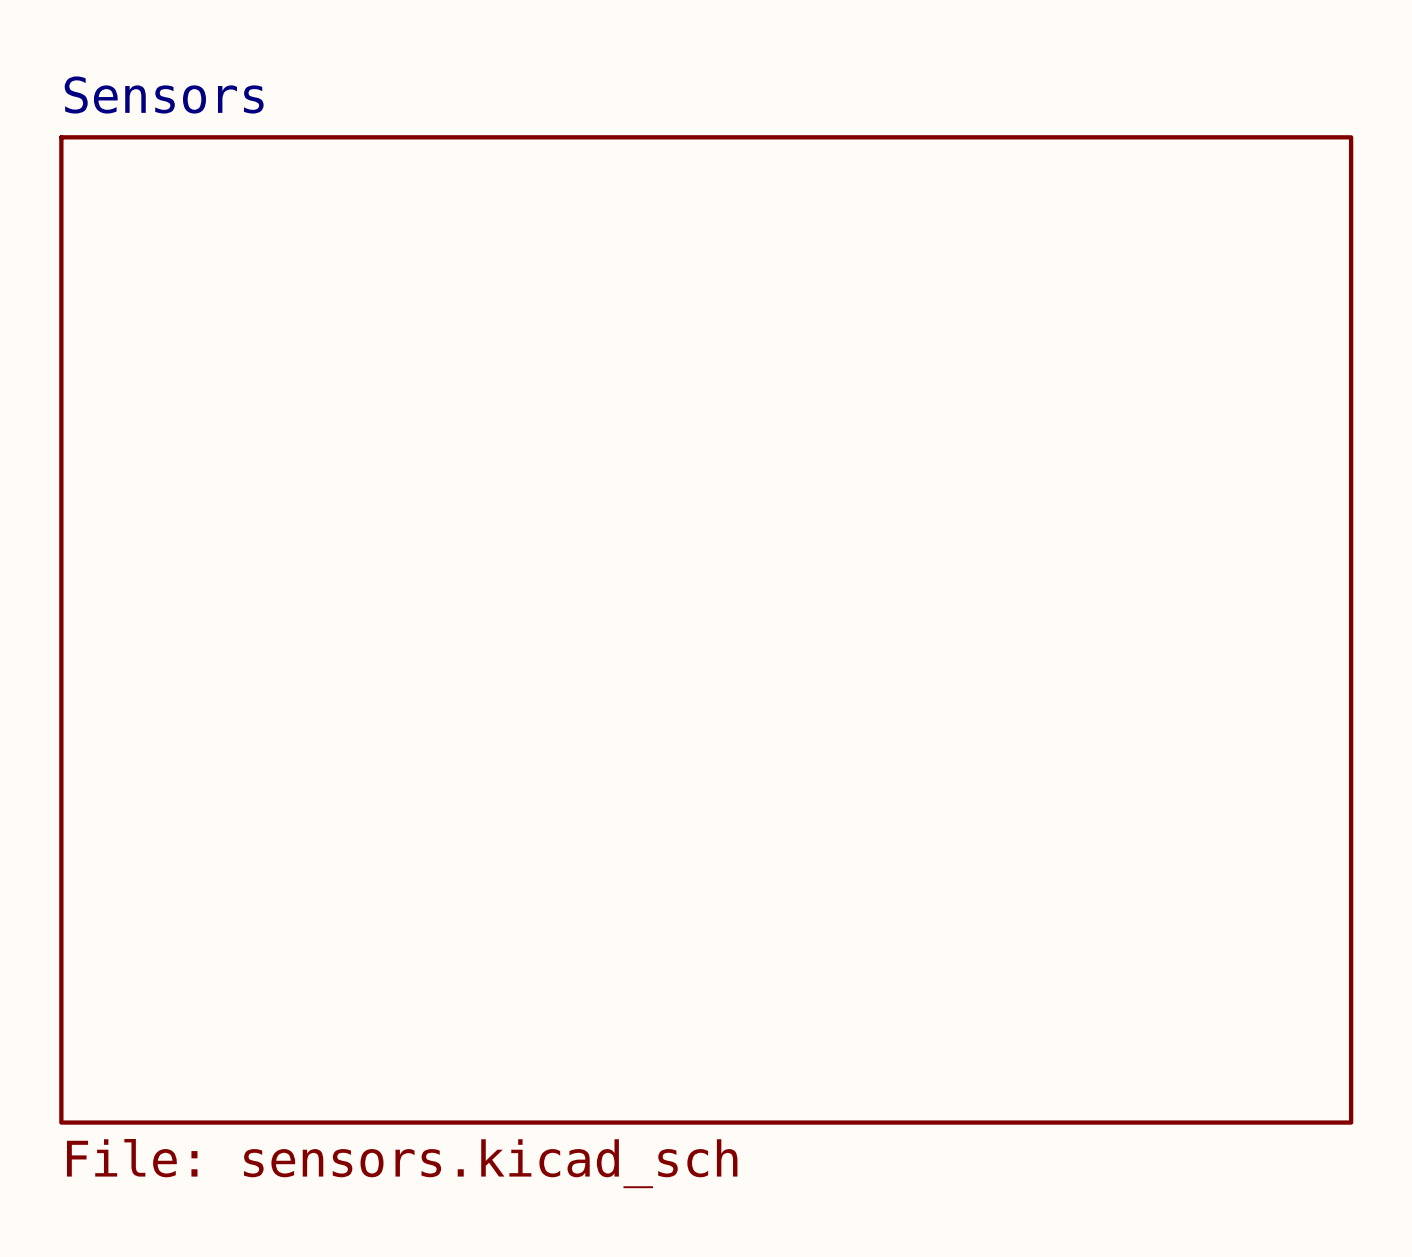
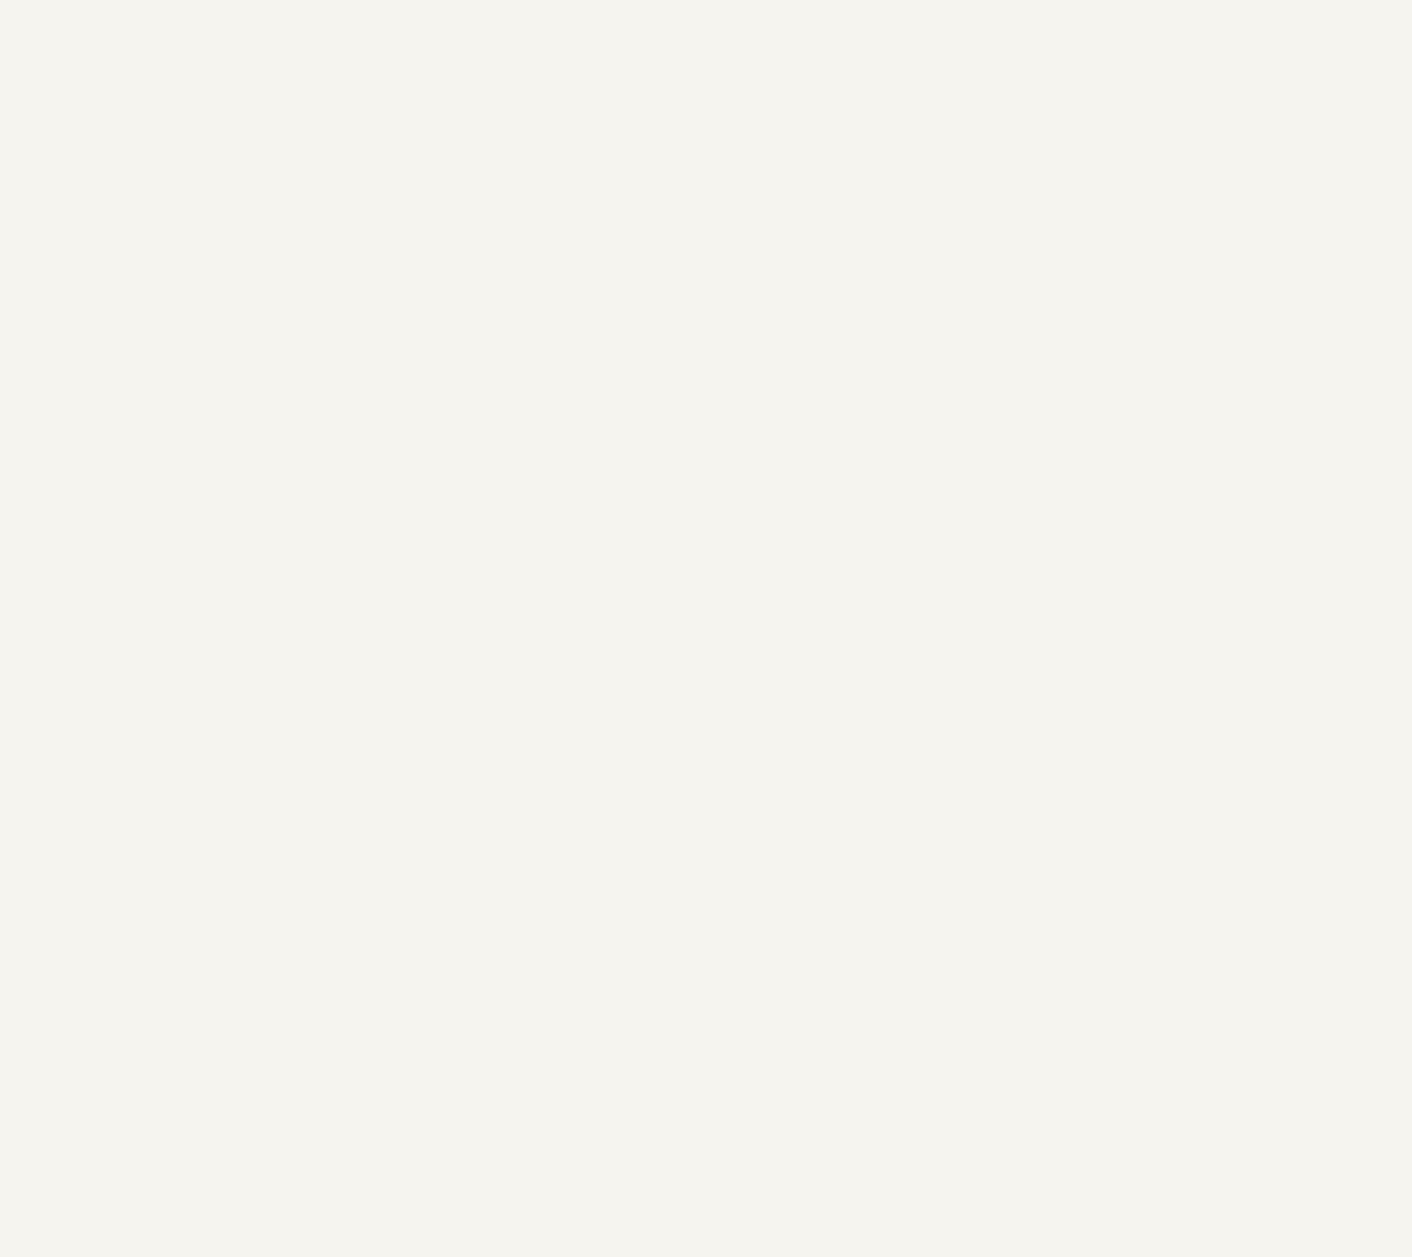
sheet Sensors: File: sensors.kicad_sch (706, 629) -> none

